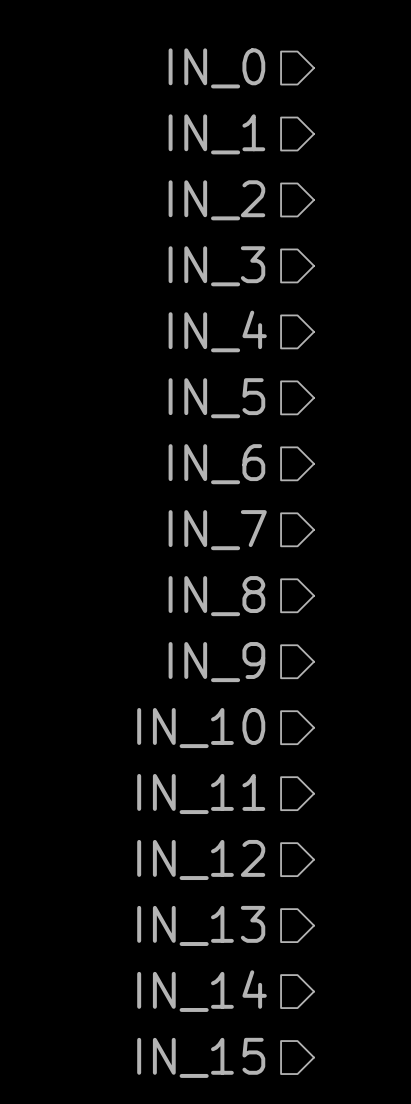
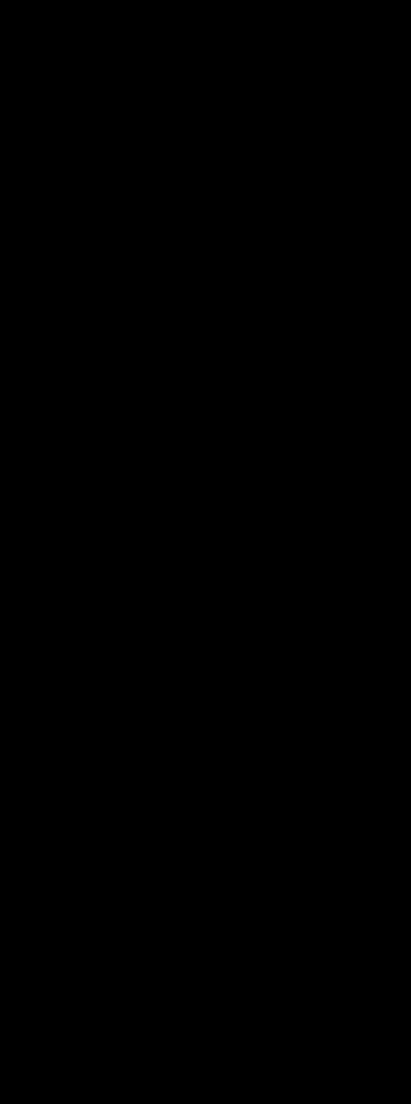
hierarchical label: IN_0 (216, 68) -> none
hierarchical label: IN_1 (216, 134) -> none
hierarchical label: IN_2 (216, 200) -> none
hierarchical label: IN_3 (216, 266) -> none
hierarchical label: IN_4 (217, 331) -> none
hierarchical label: IN_5 (216, 398) -> none
hierarchical label: IN_6 (216, 464) -> none
hierarchical label: IN_7 (217, 530) -> none
hierarchical label: IN_8 (216, 596) -> none
hierarchical label: IN_9 (216, 662) -> none
hierarchical label: IN_10 (201, 728) -> none
hierarchical label: IN_11 (201, 794) -> none
hierarchical label: IN_12 (201, 859) -> none
hierarchical label: IN_13 (201, 925) -> none
hierarchical label: IN_14 (202, 991) -> none
hierarchical label: IN_15 (201, 1057) -> none

